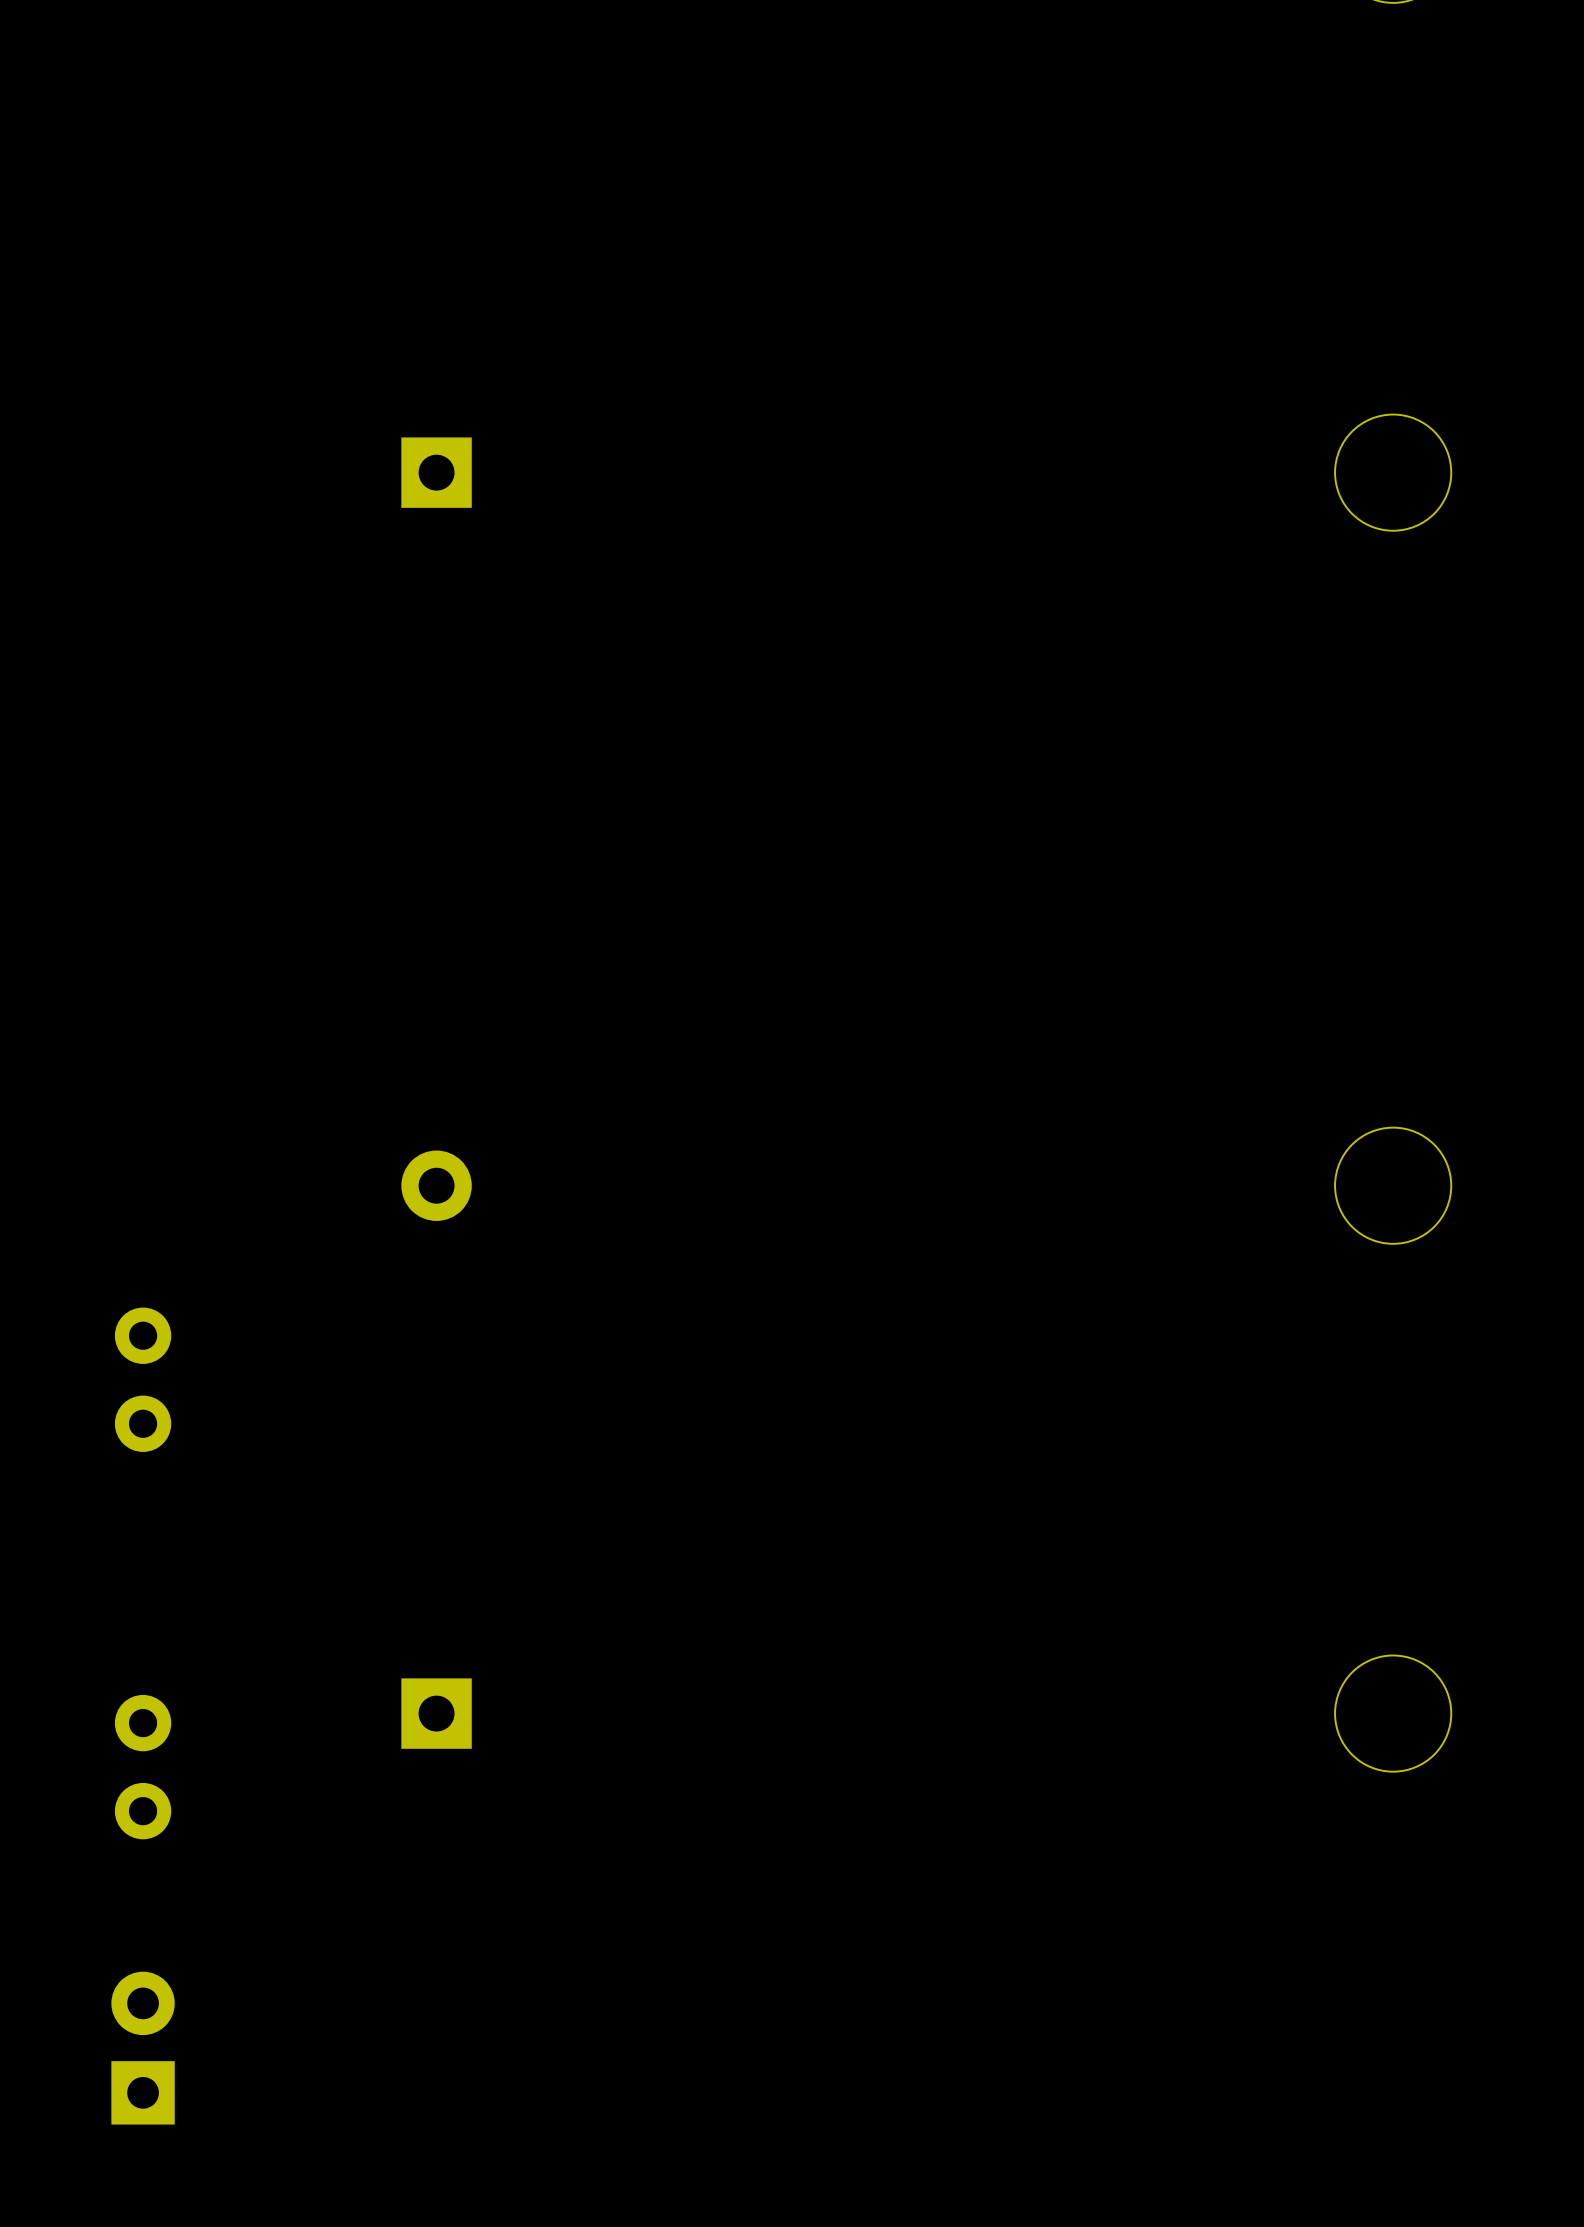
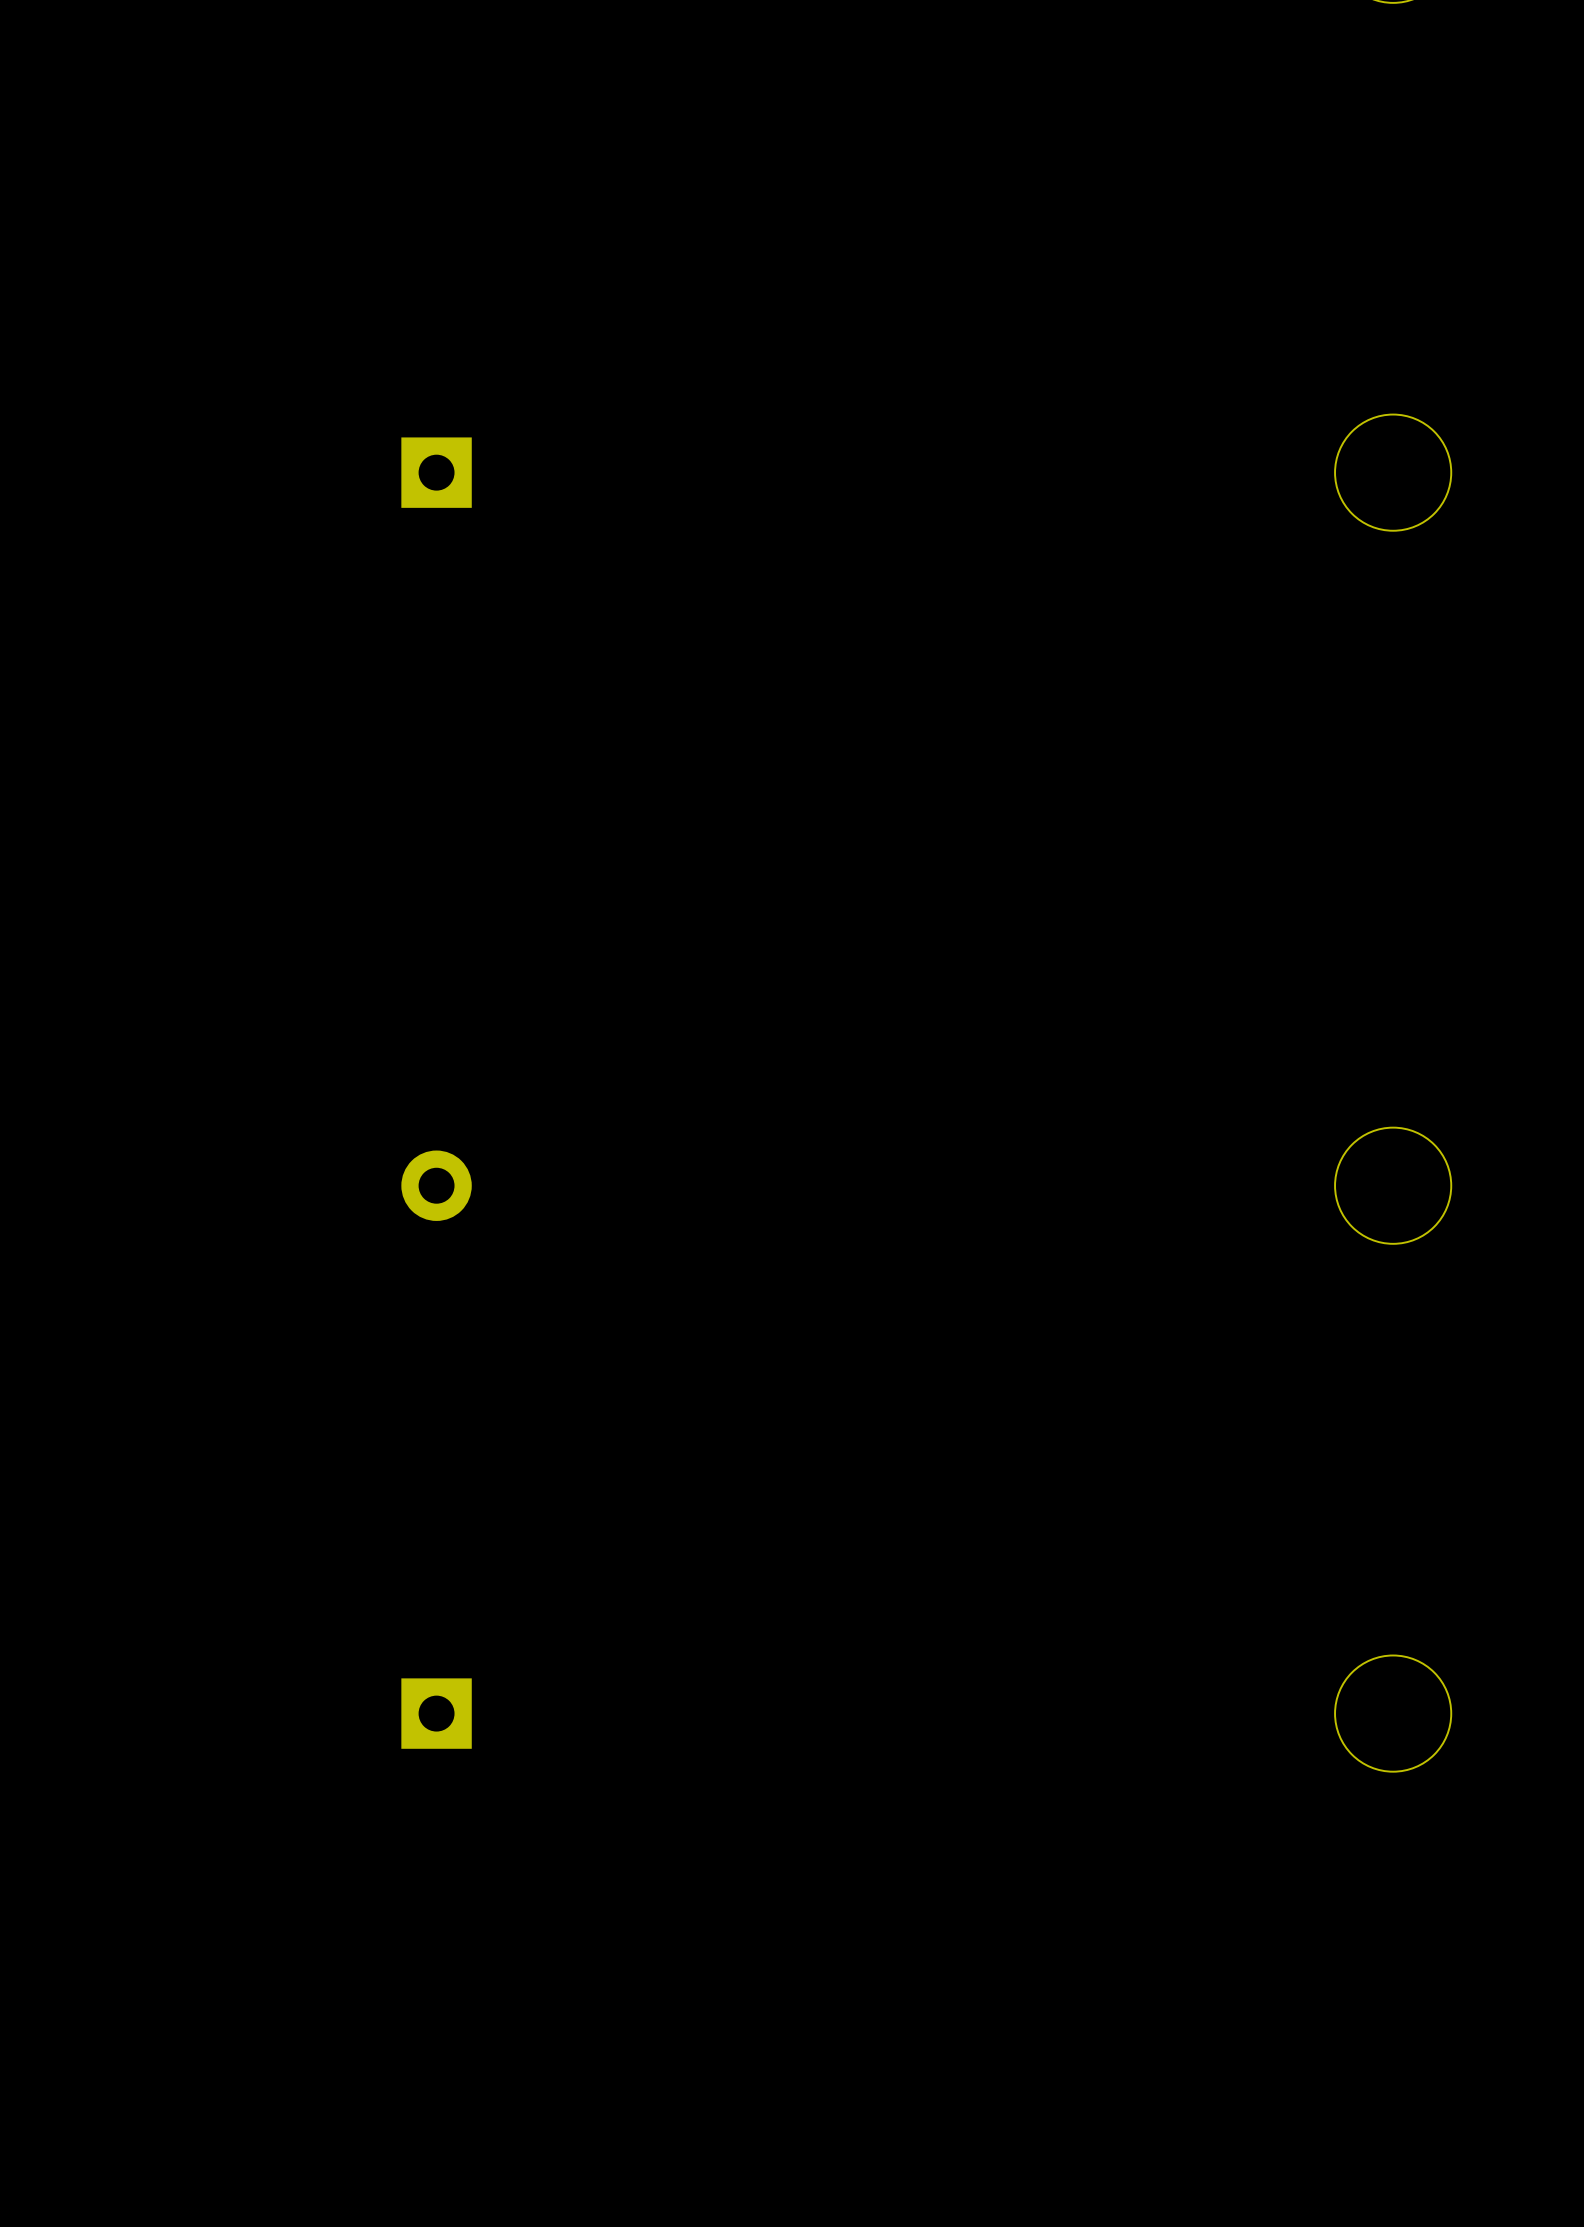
part: (143, 1379) -> none
part: (143, 1767) -> none
part: (143, 2048) -> none

